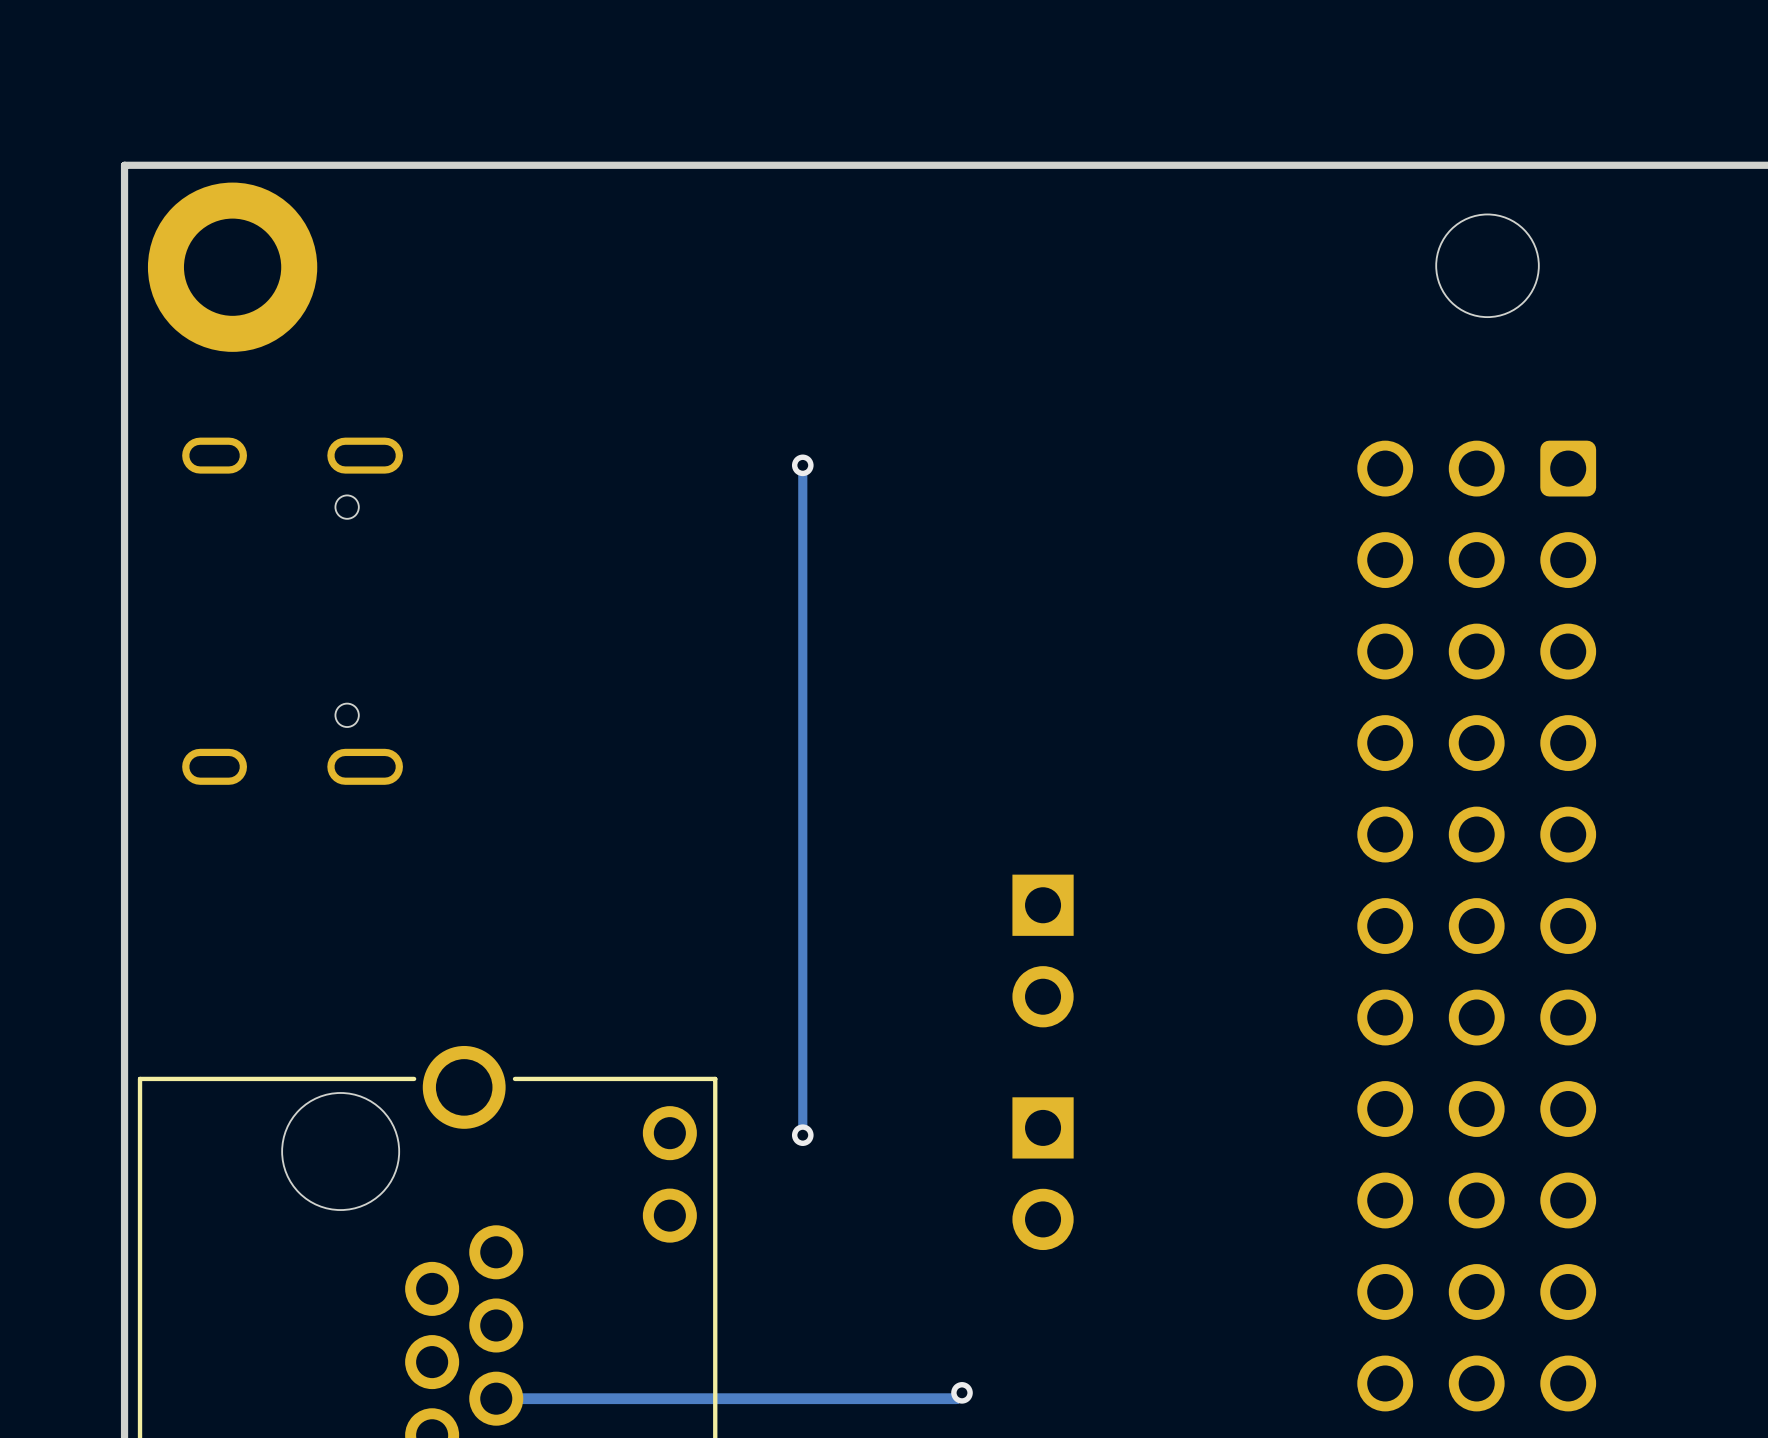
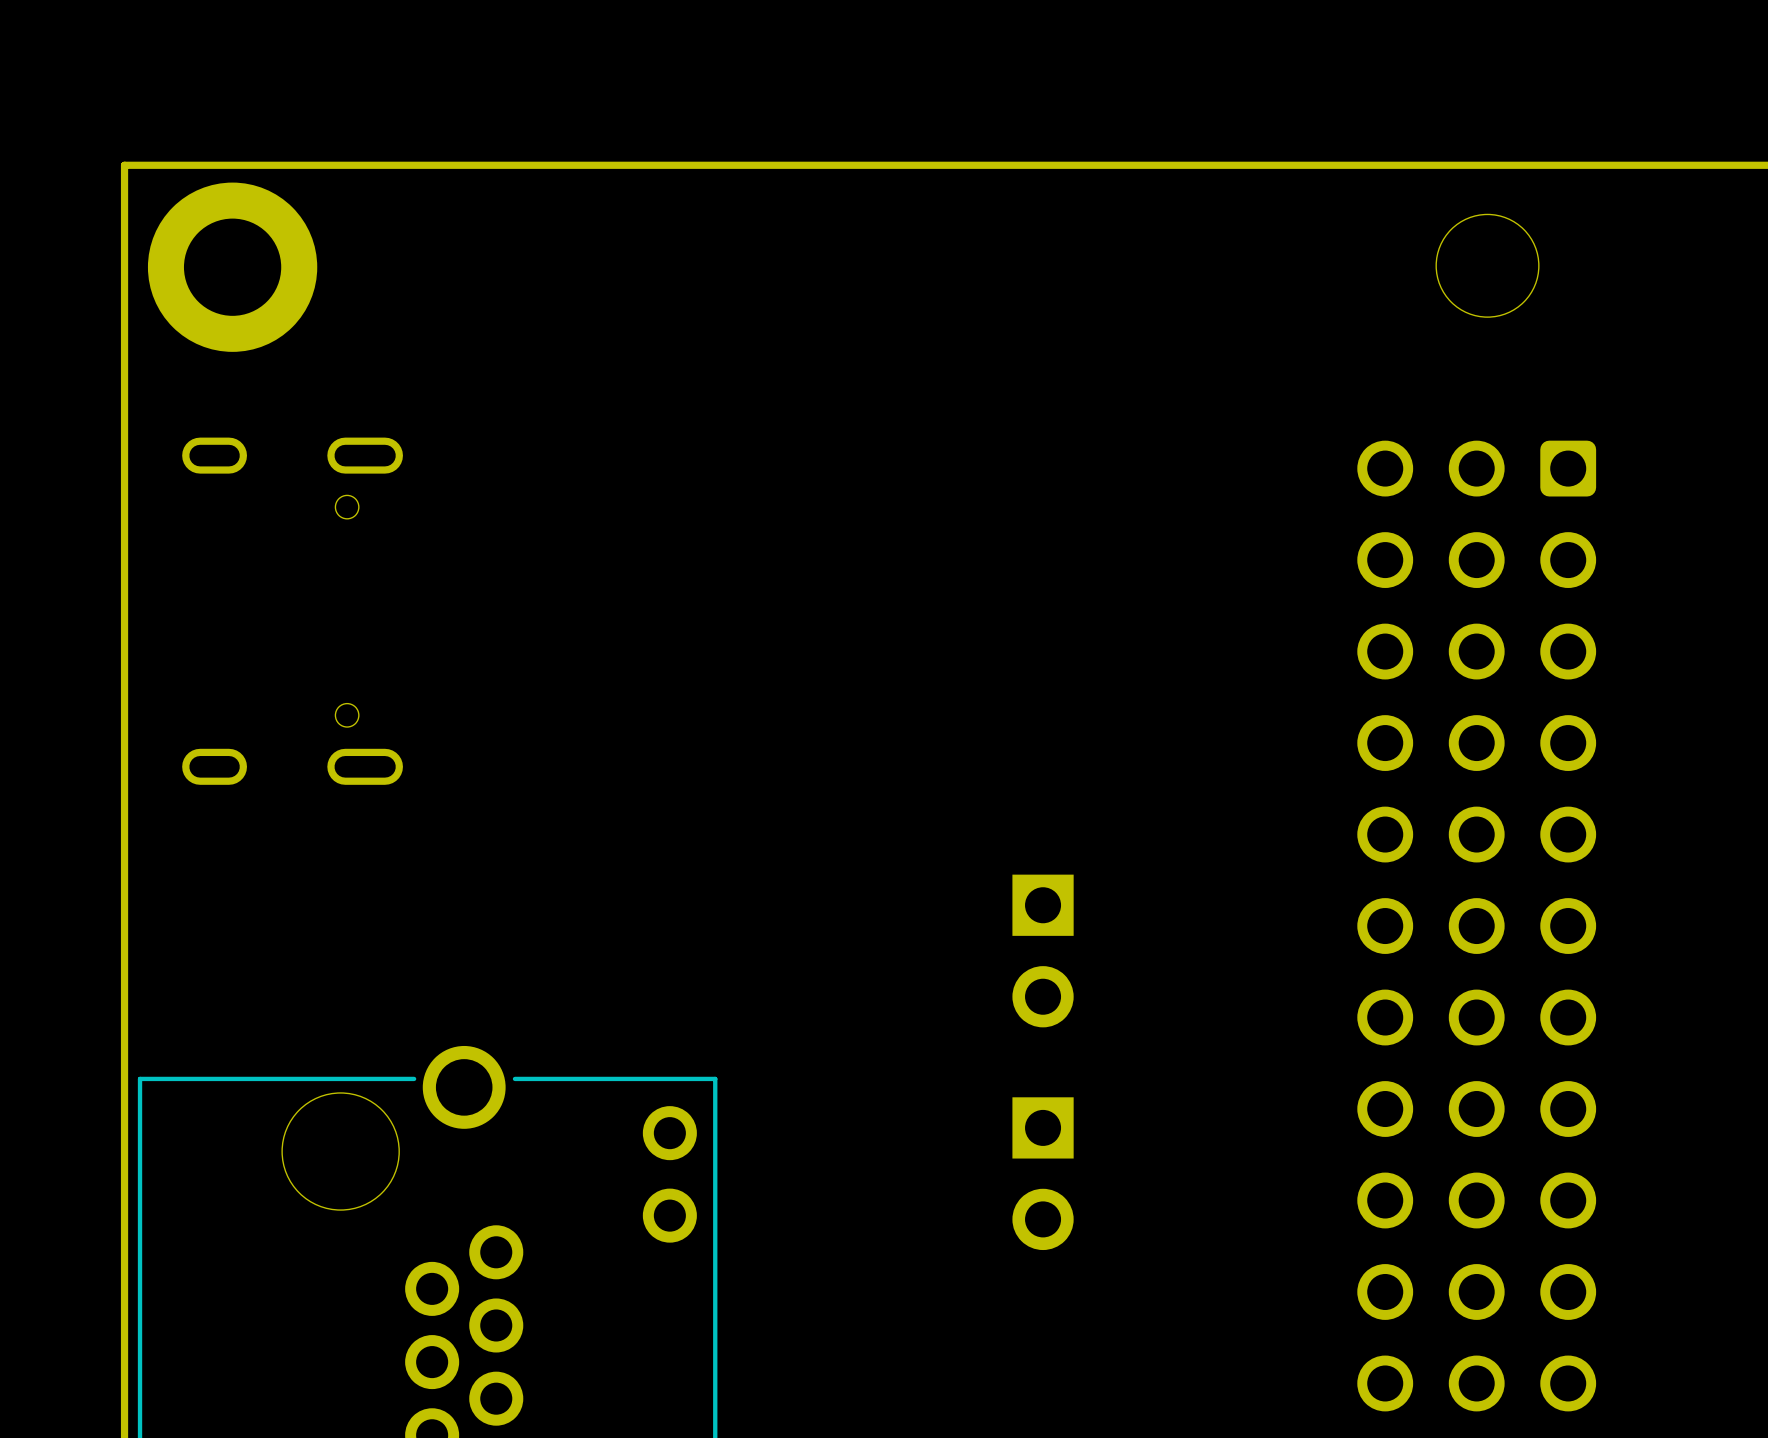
track: (802, 465) (802, 1135) -> none
via: (802, 465) -> none
via: (802, 1135) -> none
track: (961, 1392) (956, 1398) (496, 1398) -> none
via: (961, 1392) -> none

